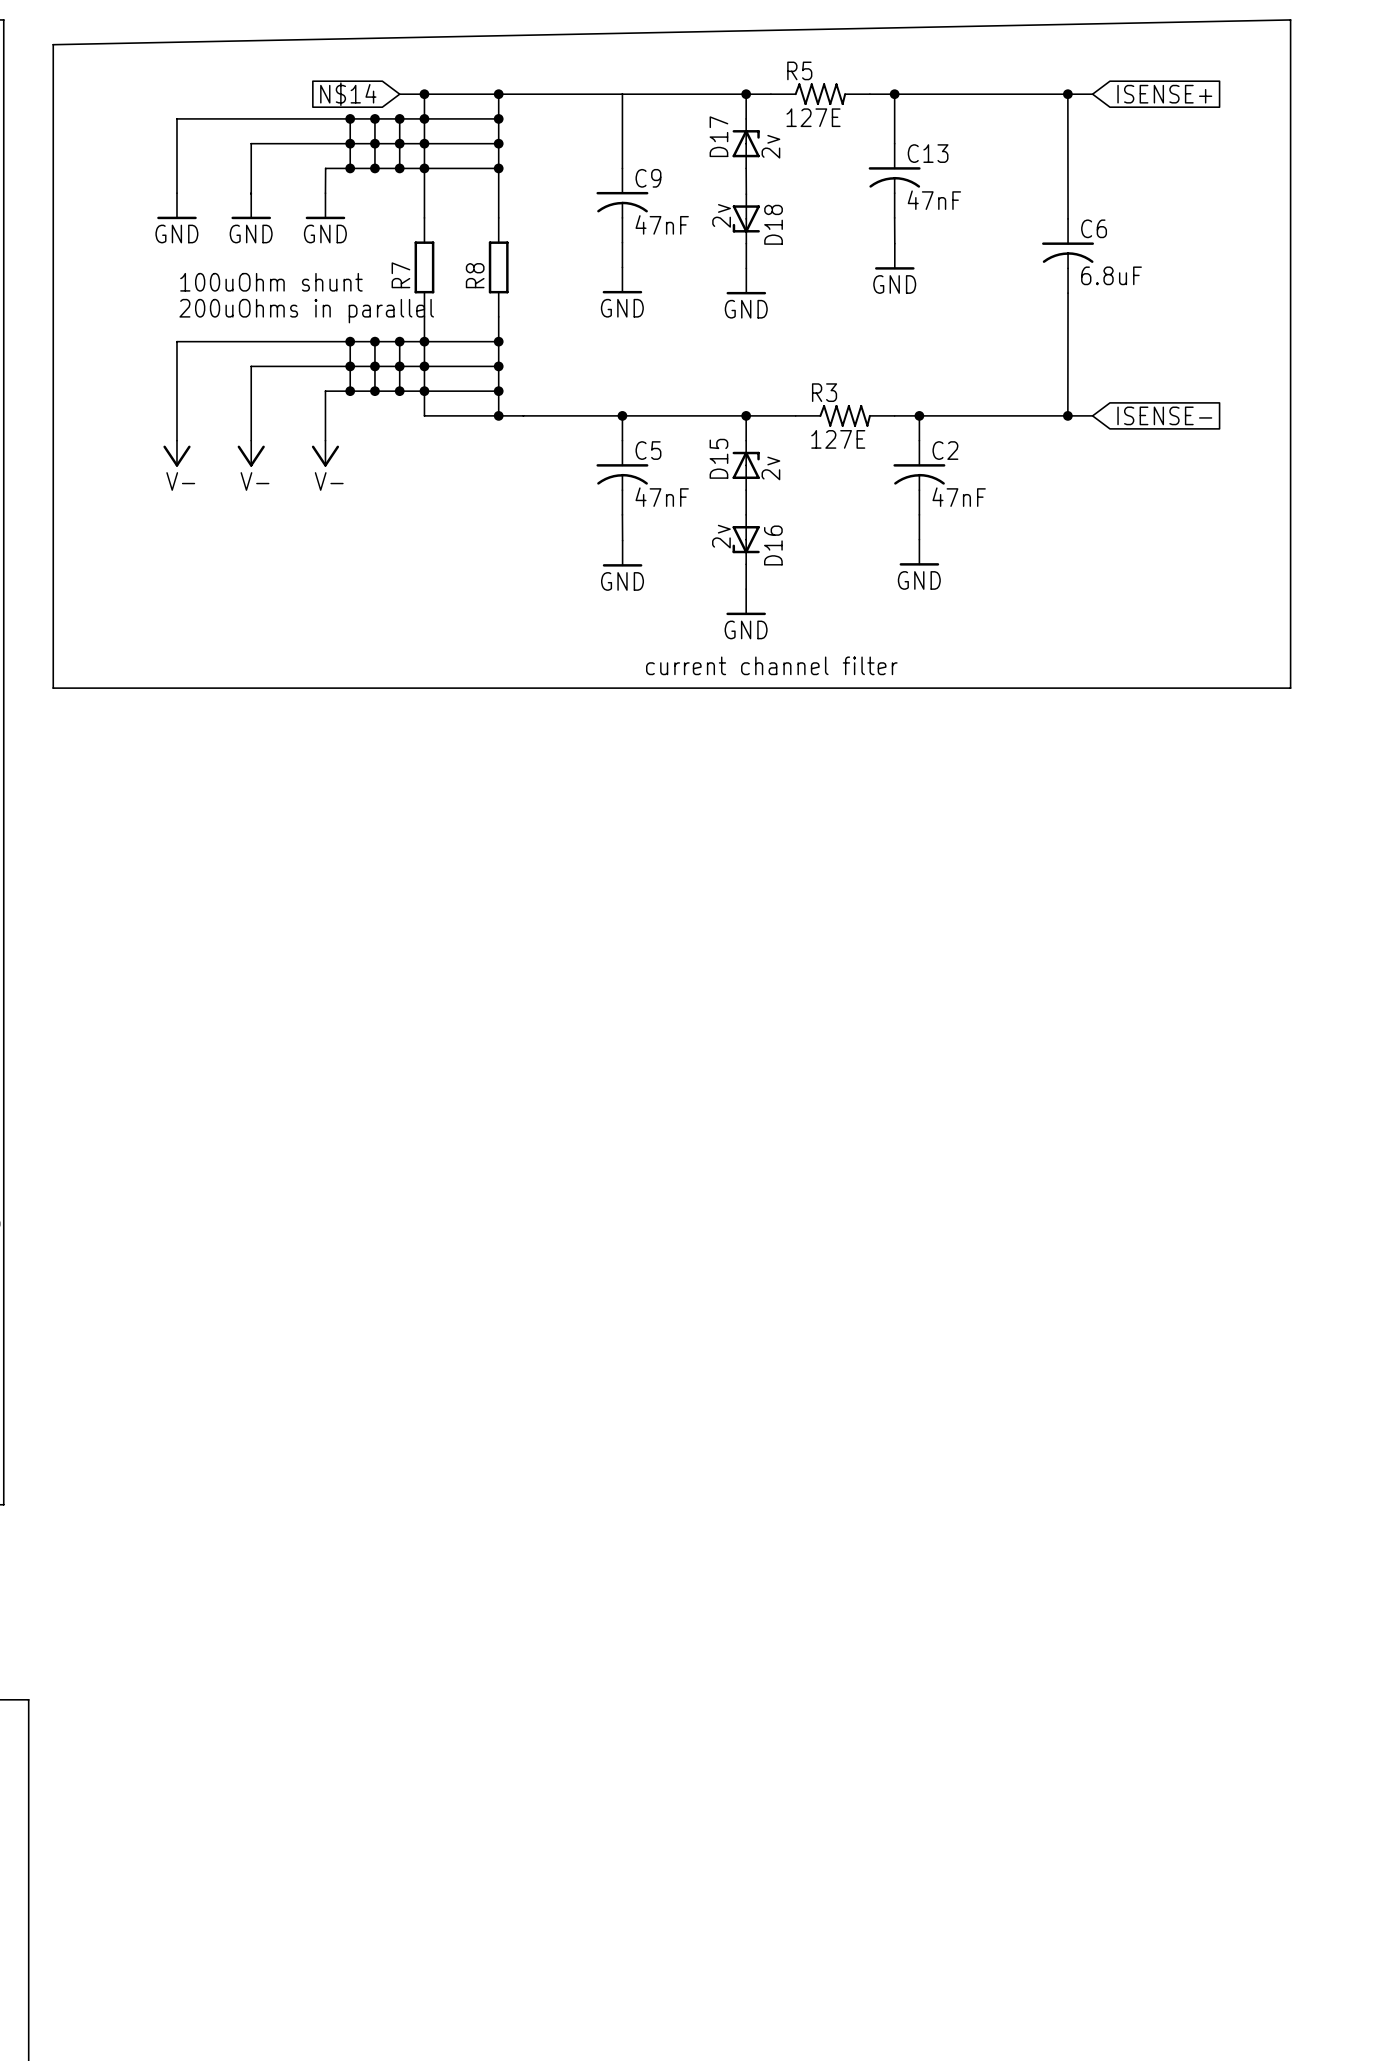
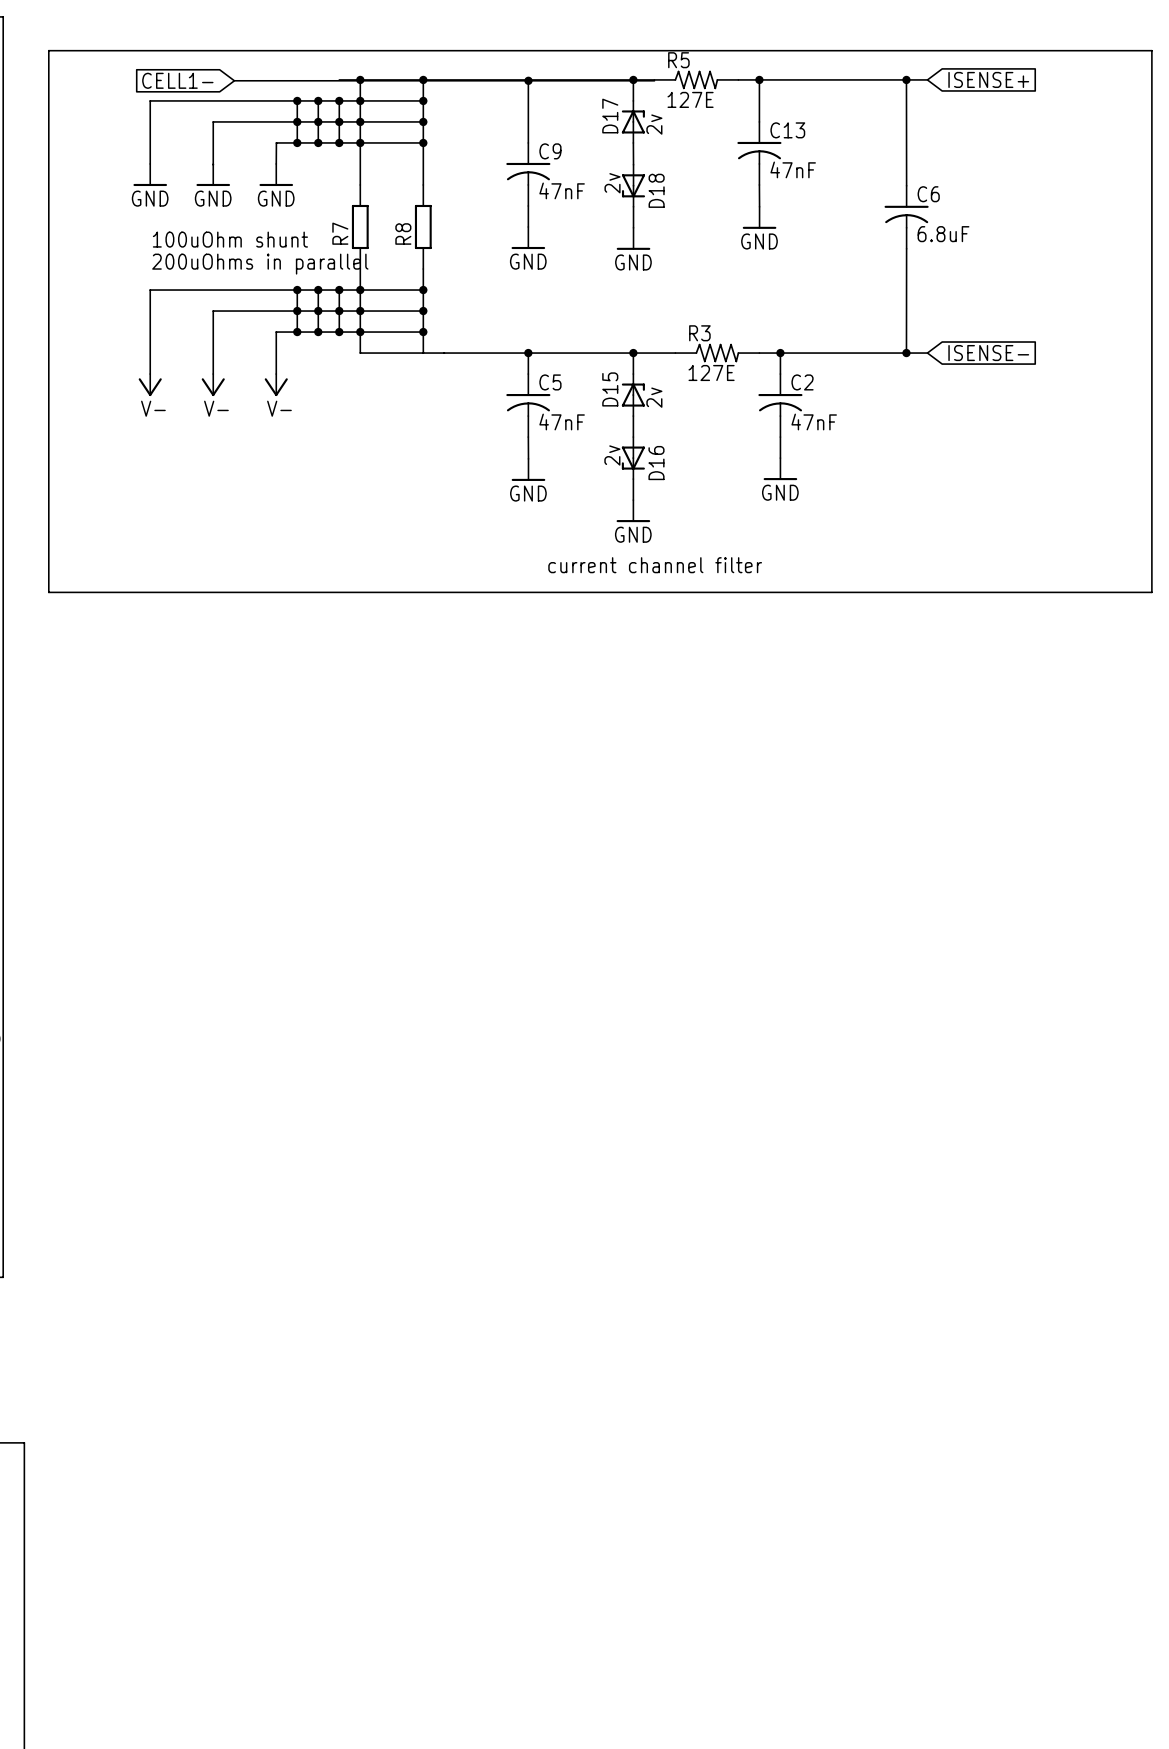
wire: (1290, 19) (53, 44) (53, 688) (1290, 688) (1290, 19) -> (48, 50) (48, 592) (1151, 592) (1151, 50) (48, 50)
global label: N$14 (348, 94) -> none
global label: none -> CELL1- (177, 80)
wire: none -> (234, 80) (654, 80)
junction: none -> (528, 80)
junction: (498, 415) -> none

